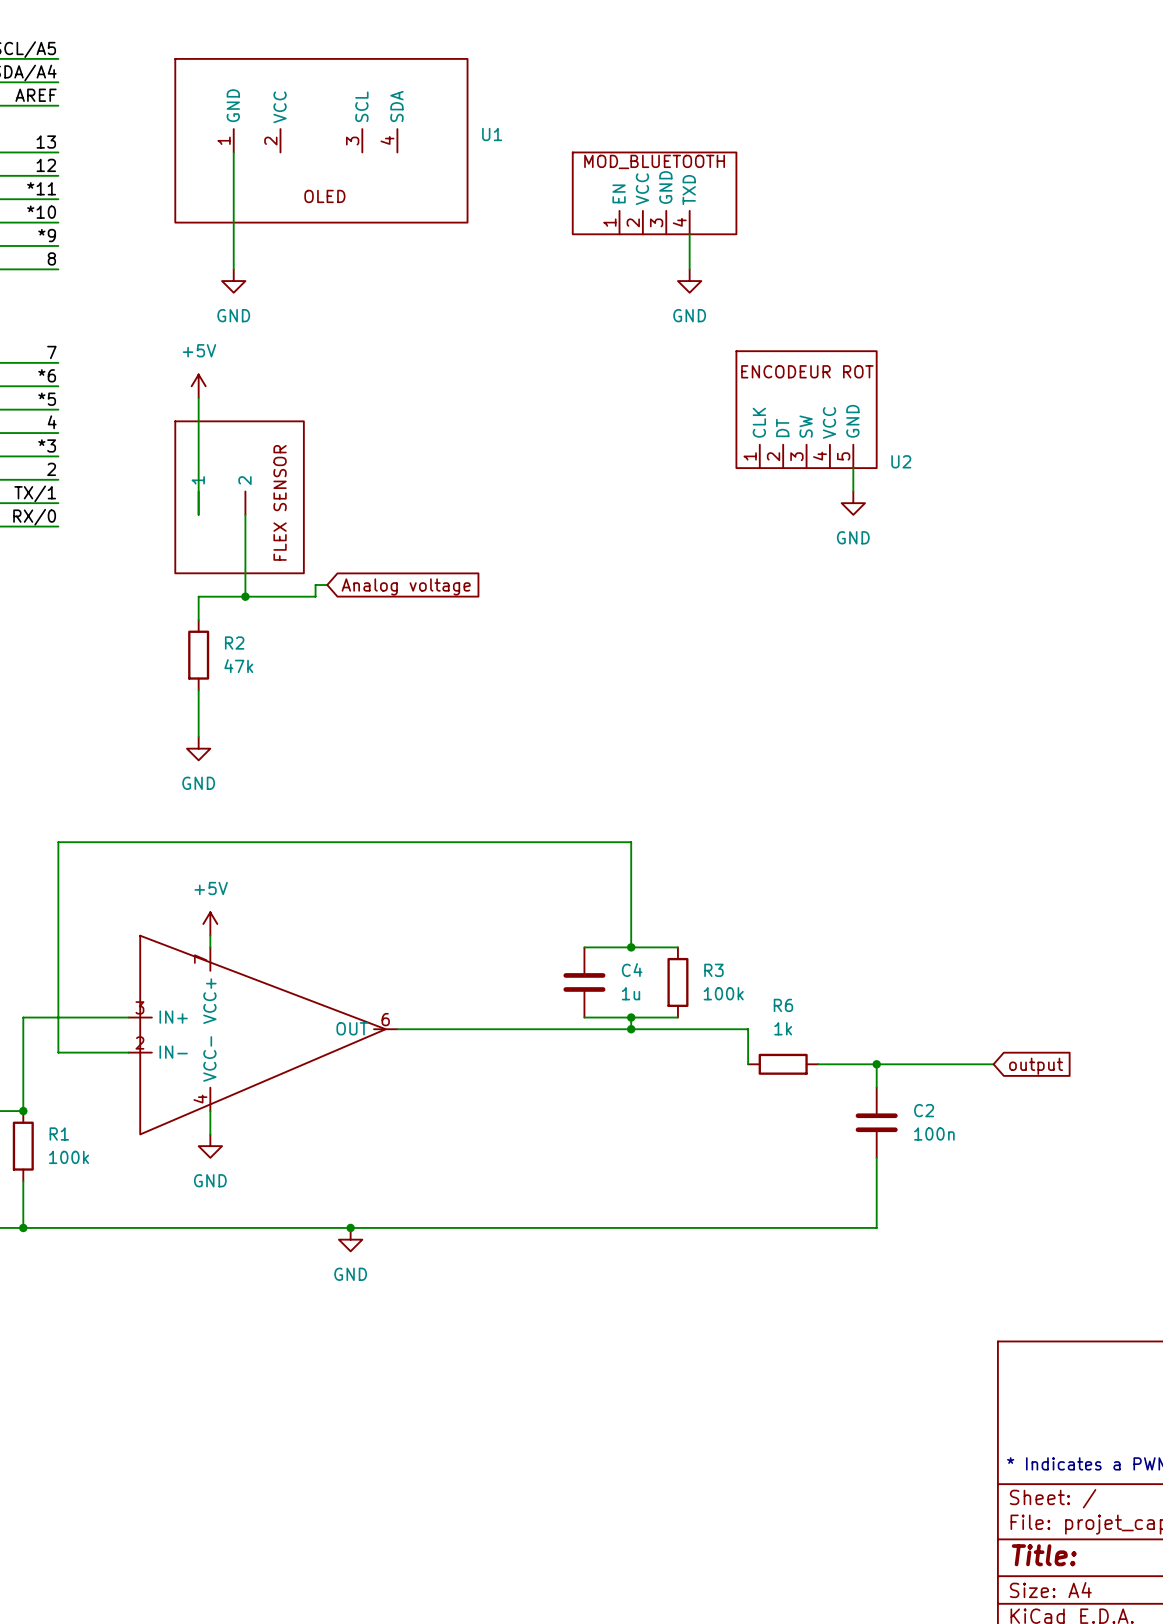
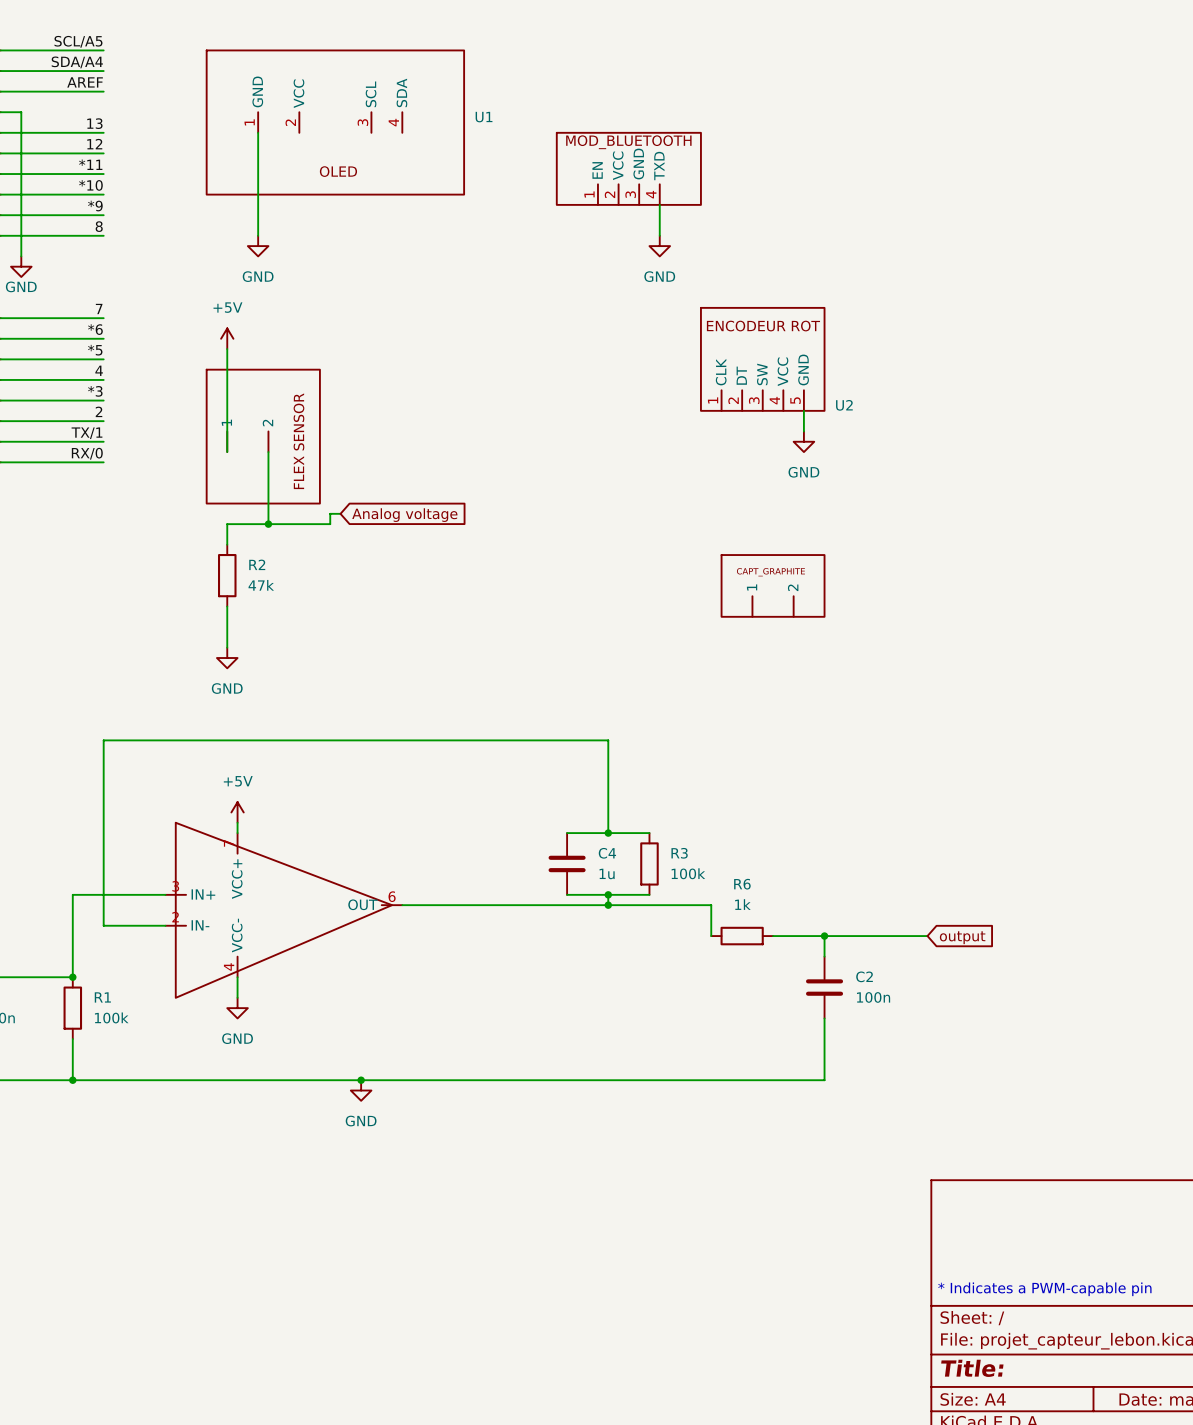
part: none -> (773, 585)

